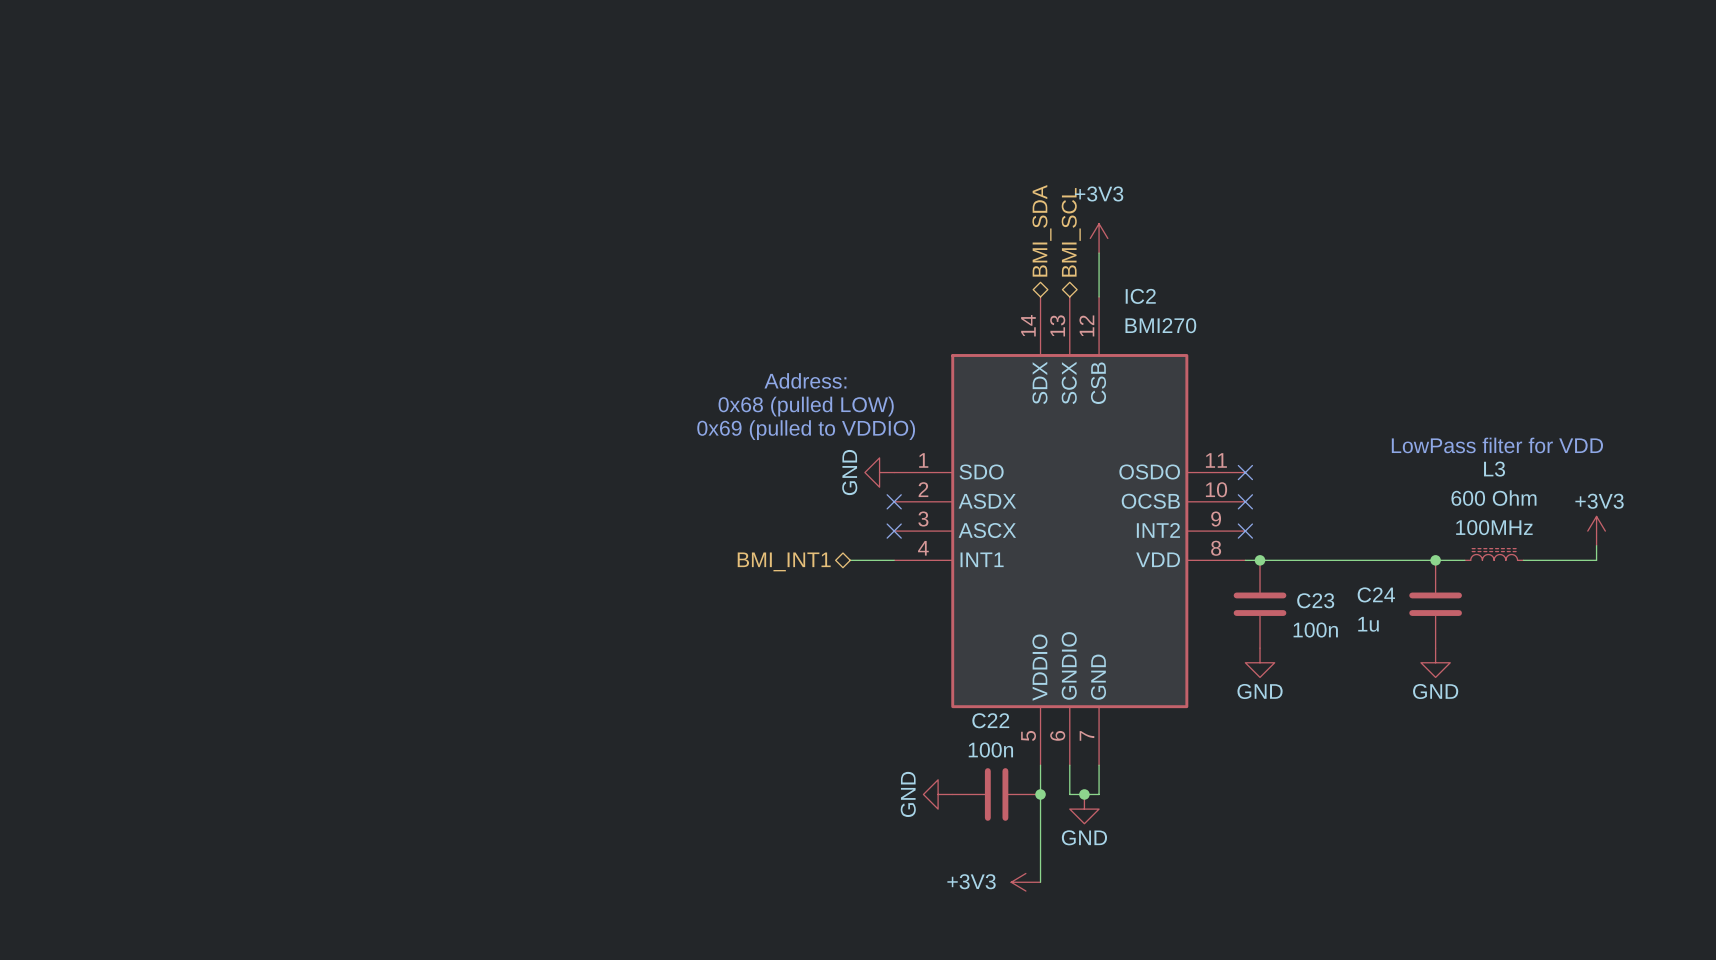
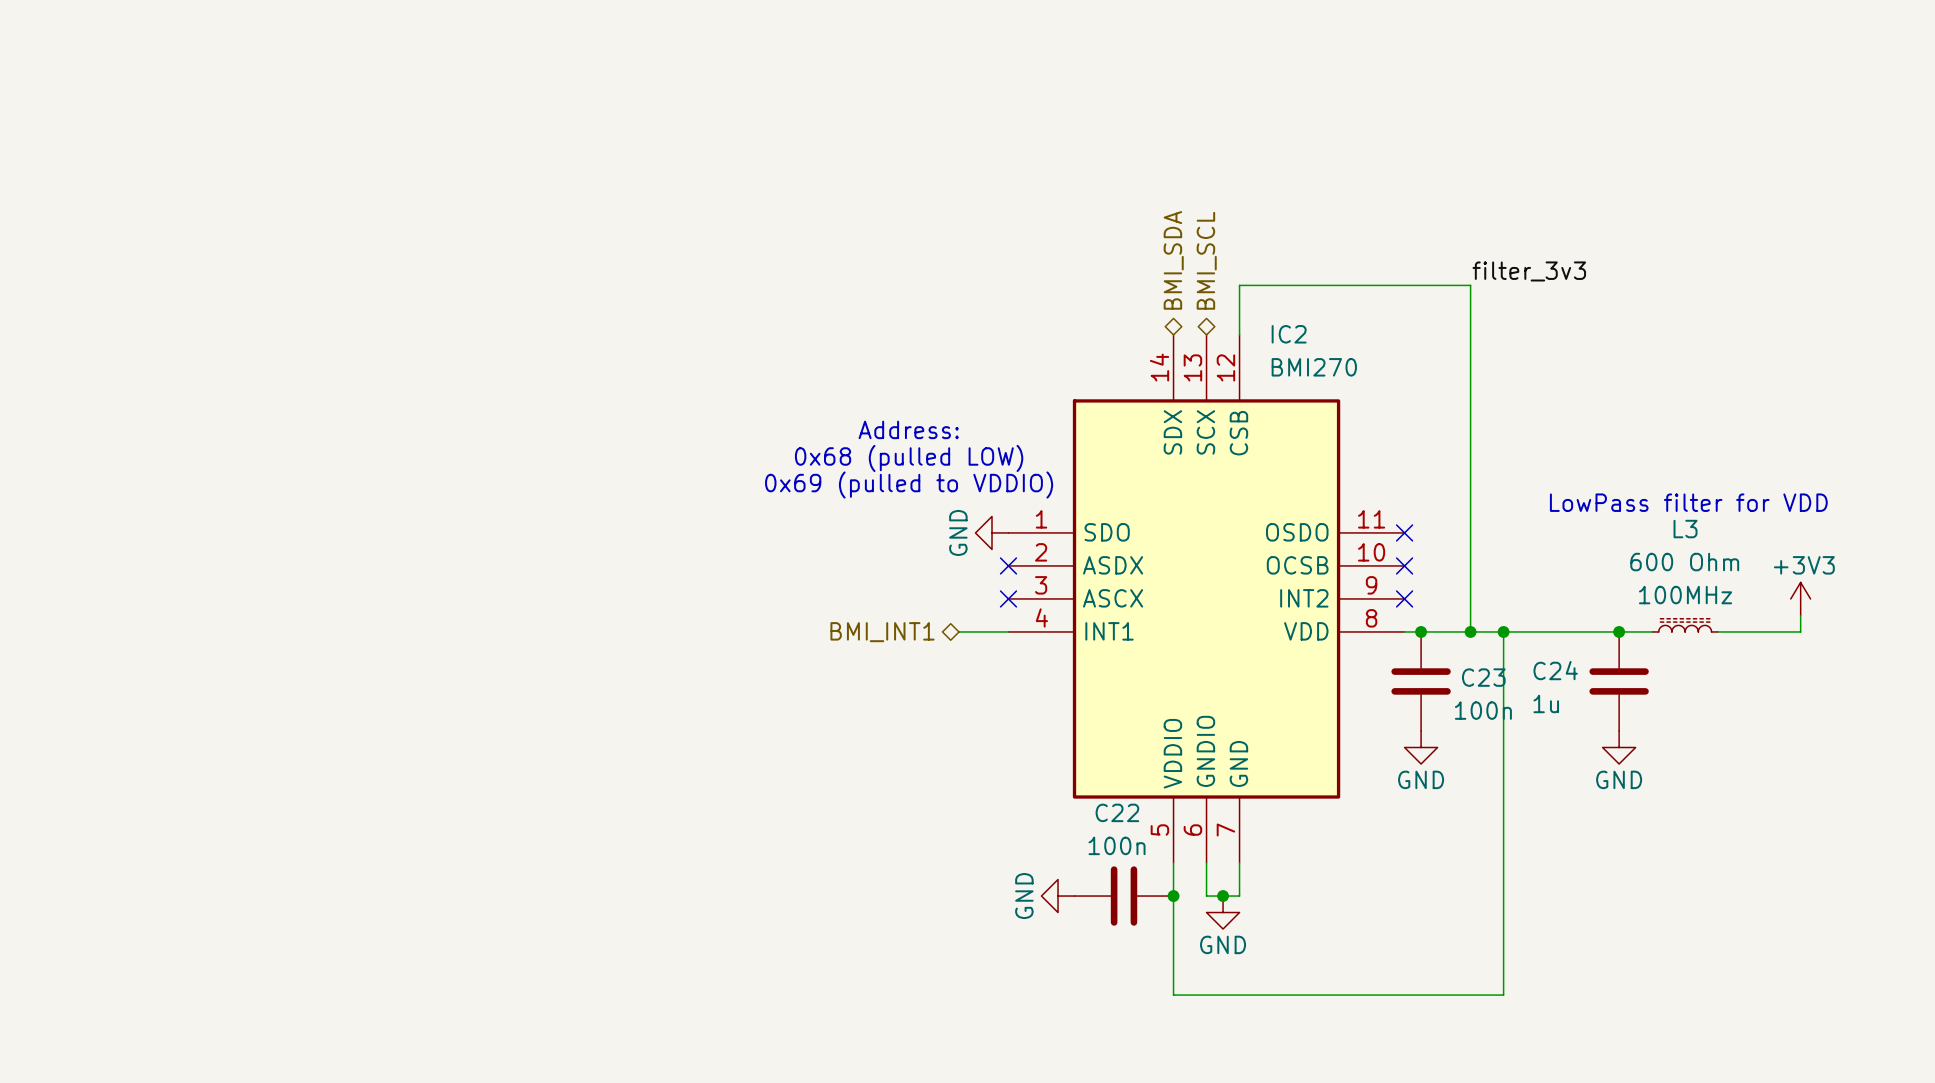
power symbol: +3V3 (1099, 238) -> none
label: none -> filter_3v3 (1529, 271)
wire: none -> (1239, 285) (1470, 285) (1470, 631)
junction: none -> (1470, 631)
wire: none -> (1503, 631) (1503, 995) (1173, 995)
junction: none -> (1503, 631)
power symbol: +3V3 (1025, 882) -> none

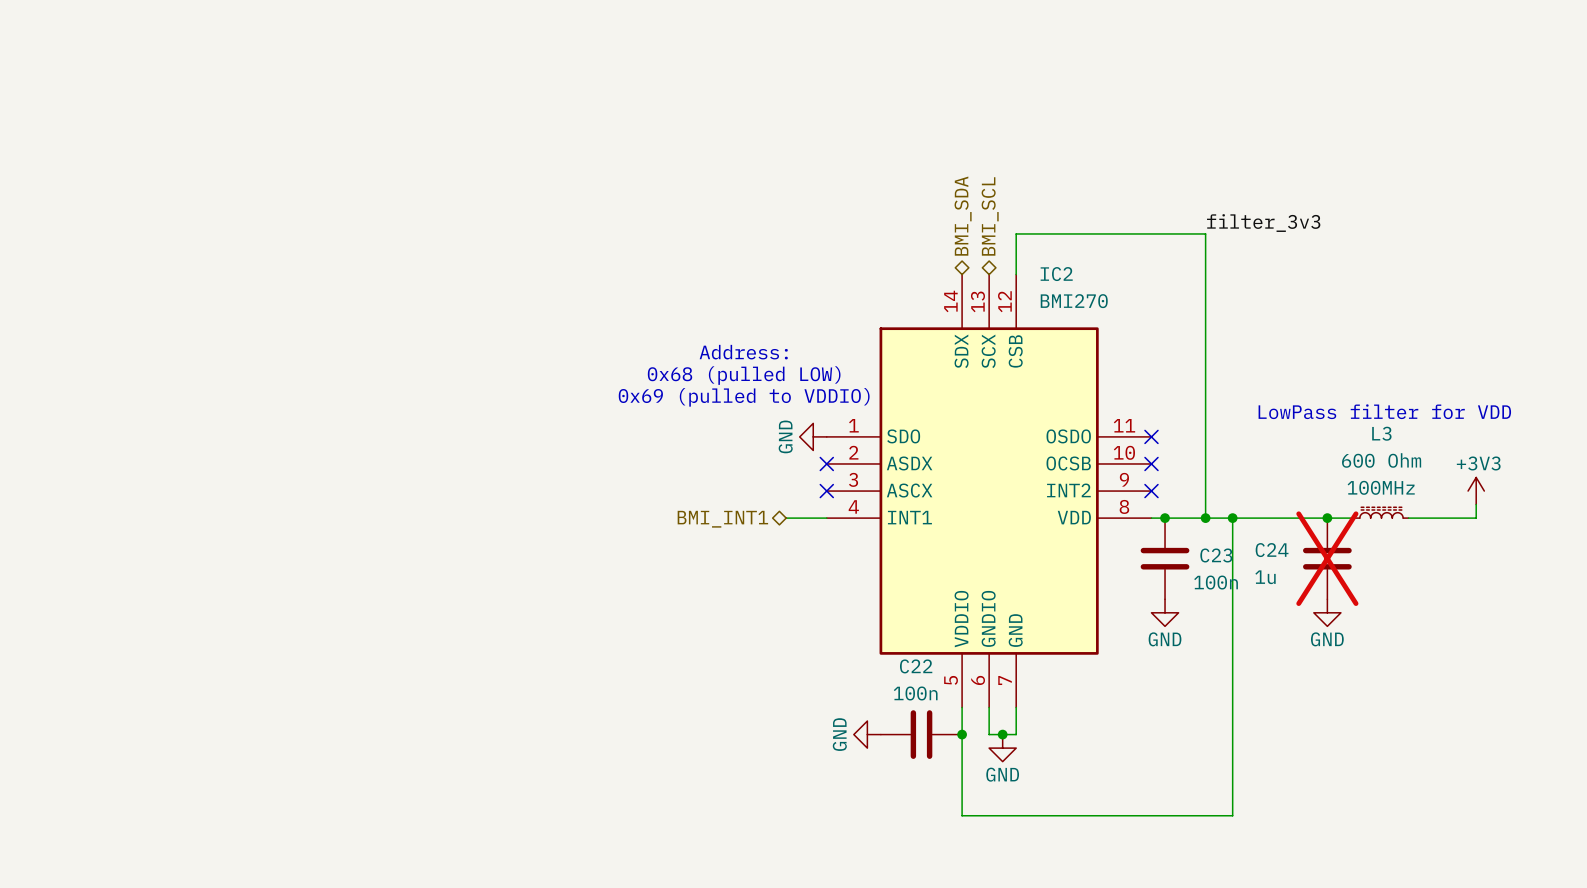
C24 do-not-place cross: none -> (1327, 558)

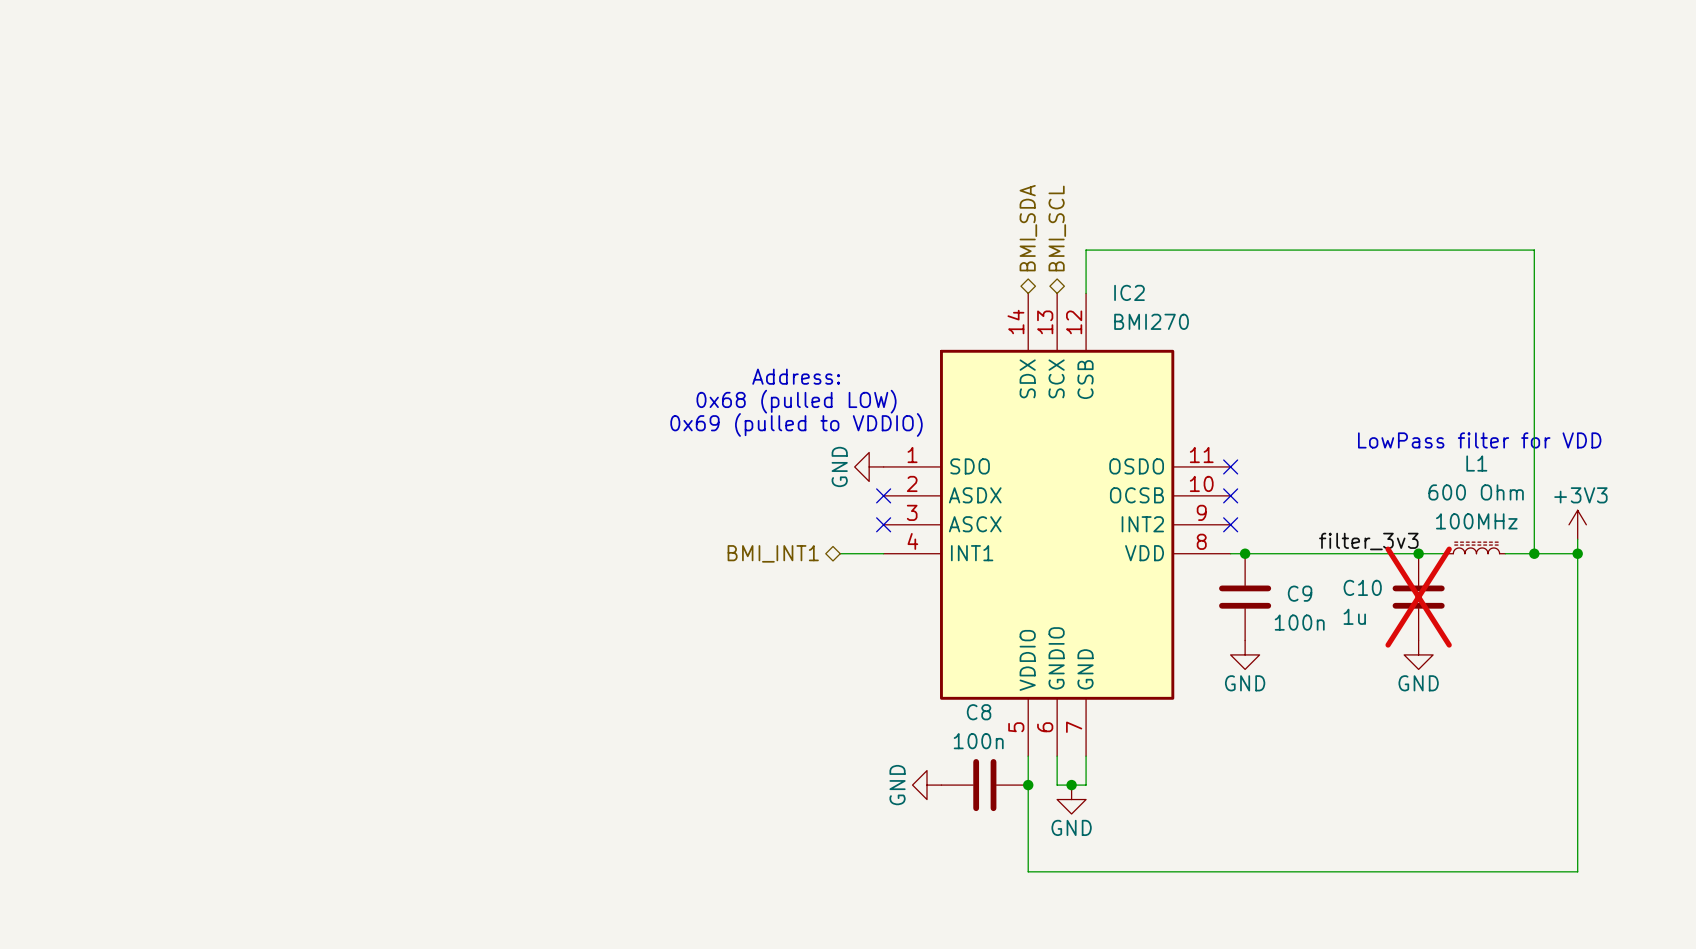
label: filter_3v3 (1263, 223) -> none
wire: (1205, 233) (1205, 518) -> (1288, 250) (1534, 250) (1534, 553)
L3 name: L3 (1381, 433) -> L1 (1476, 463)
label: none -> filter_3v3 (1368, 541)
junction: (1205, 518) -> none
wire: (1232, 518) (1232, 815) -> (1577, 553) (1577, 871) (1317, 871)
junction: (1232, 518) -> none
junction: none -> (1534, 553)
junction: none -> (1577, 553)
C24 name: C24 (1272, 550) -> C10 (1362, 587)
C23 name: C23 (1216, 555) -> C9 (1300, 593)
C22 name: C22 (916, 666) -> C8 (979, 712)

